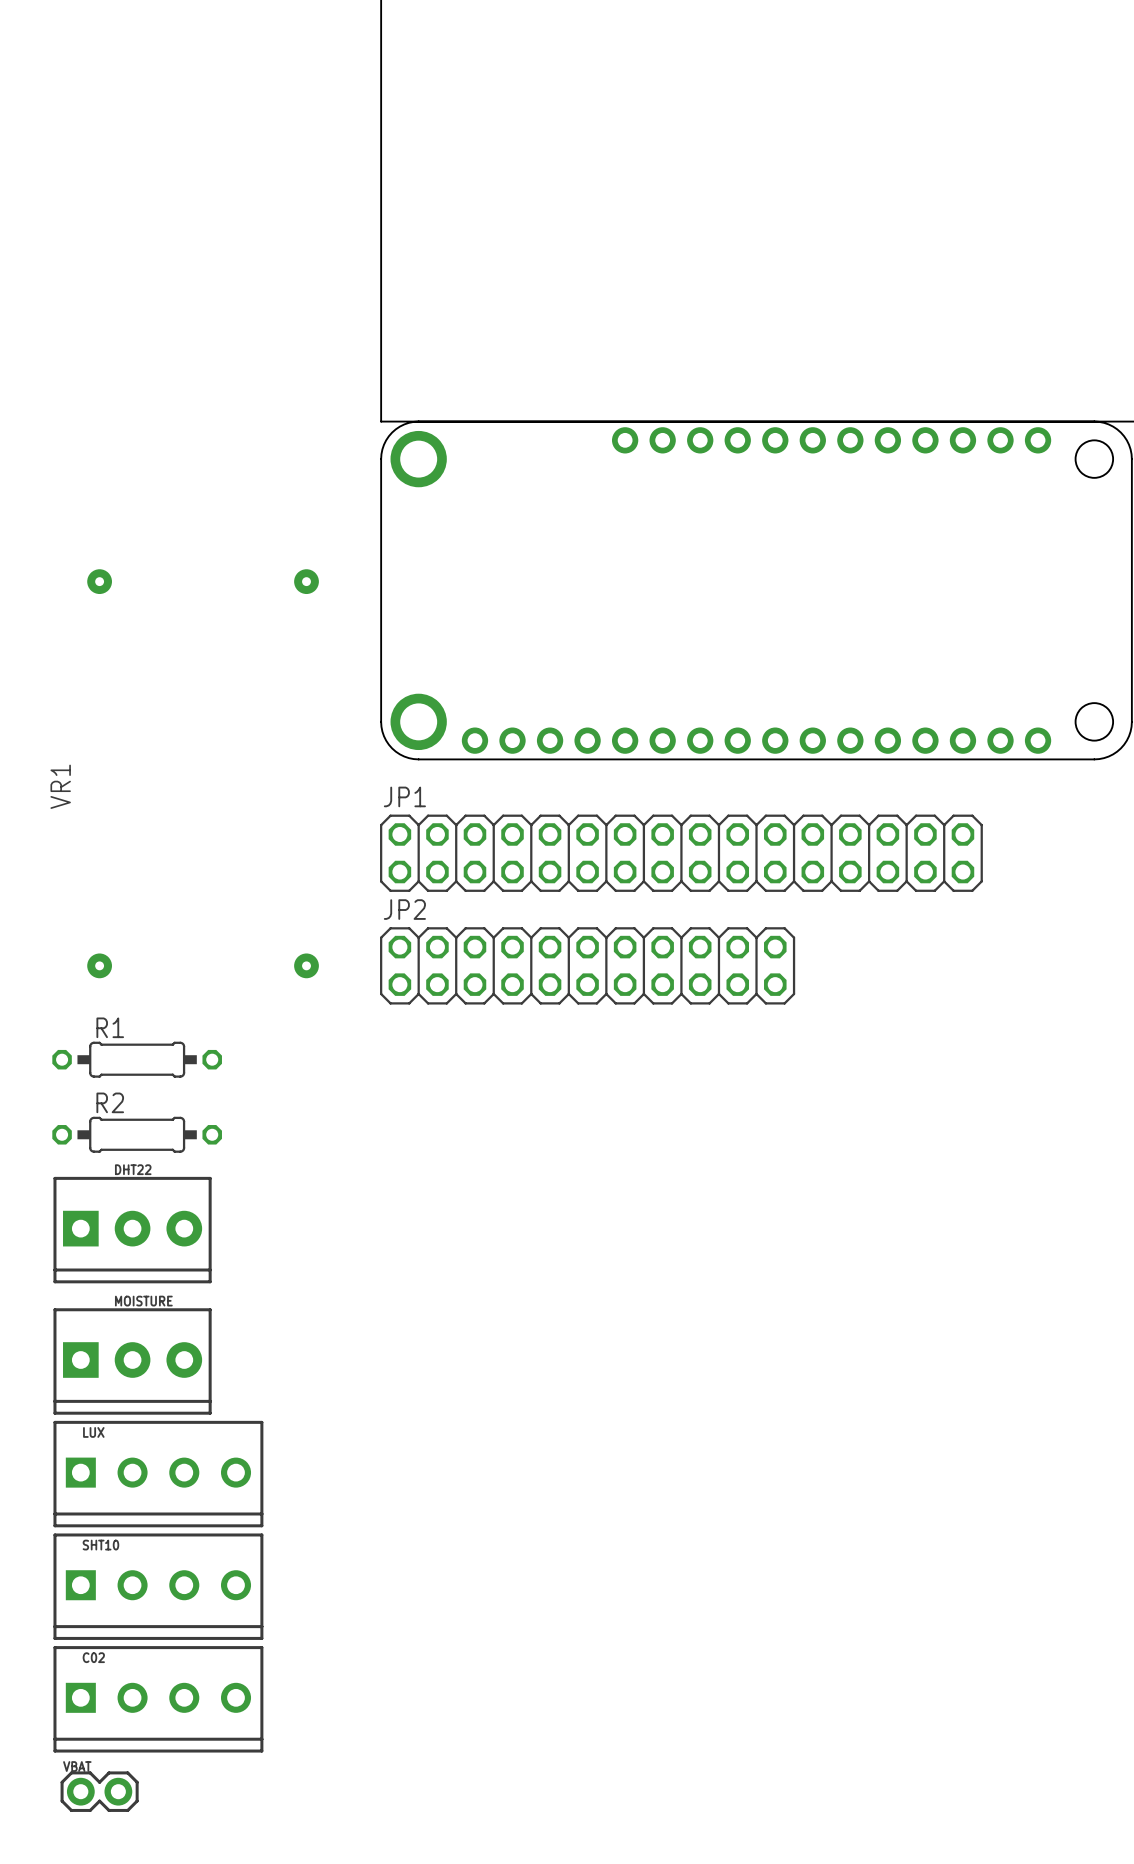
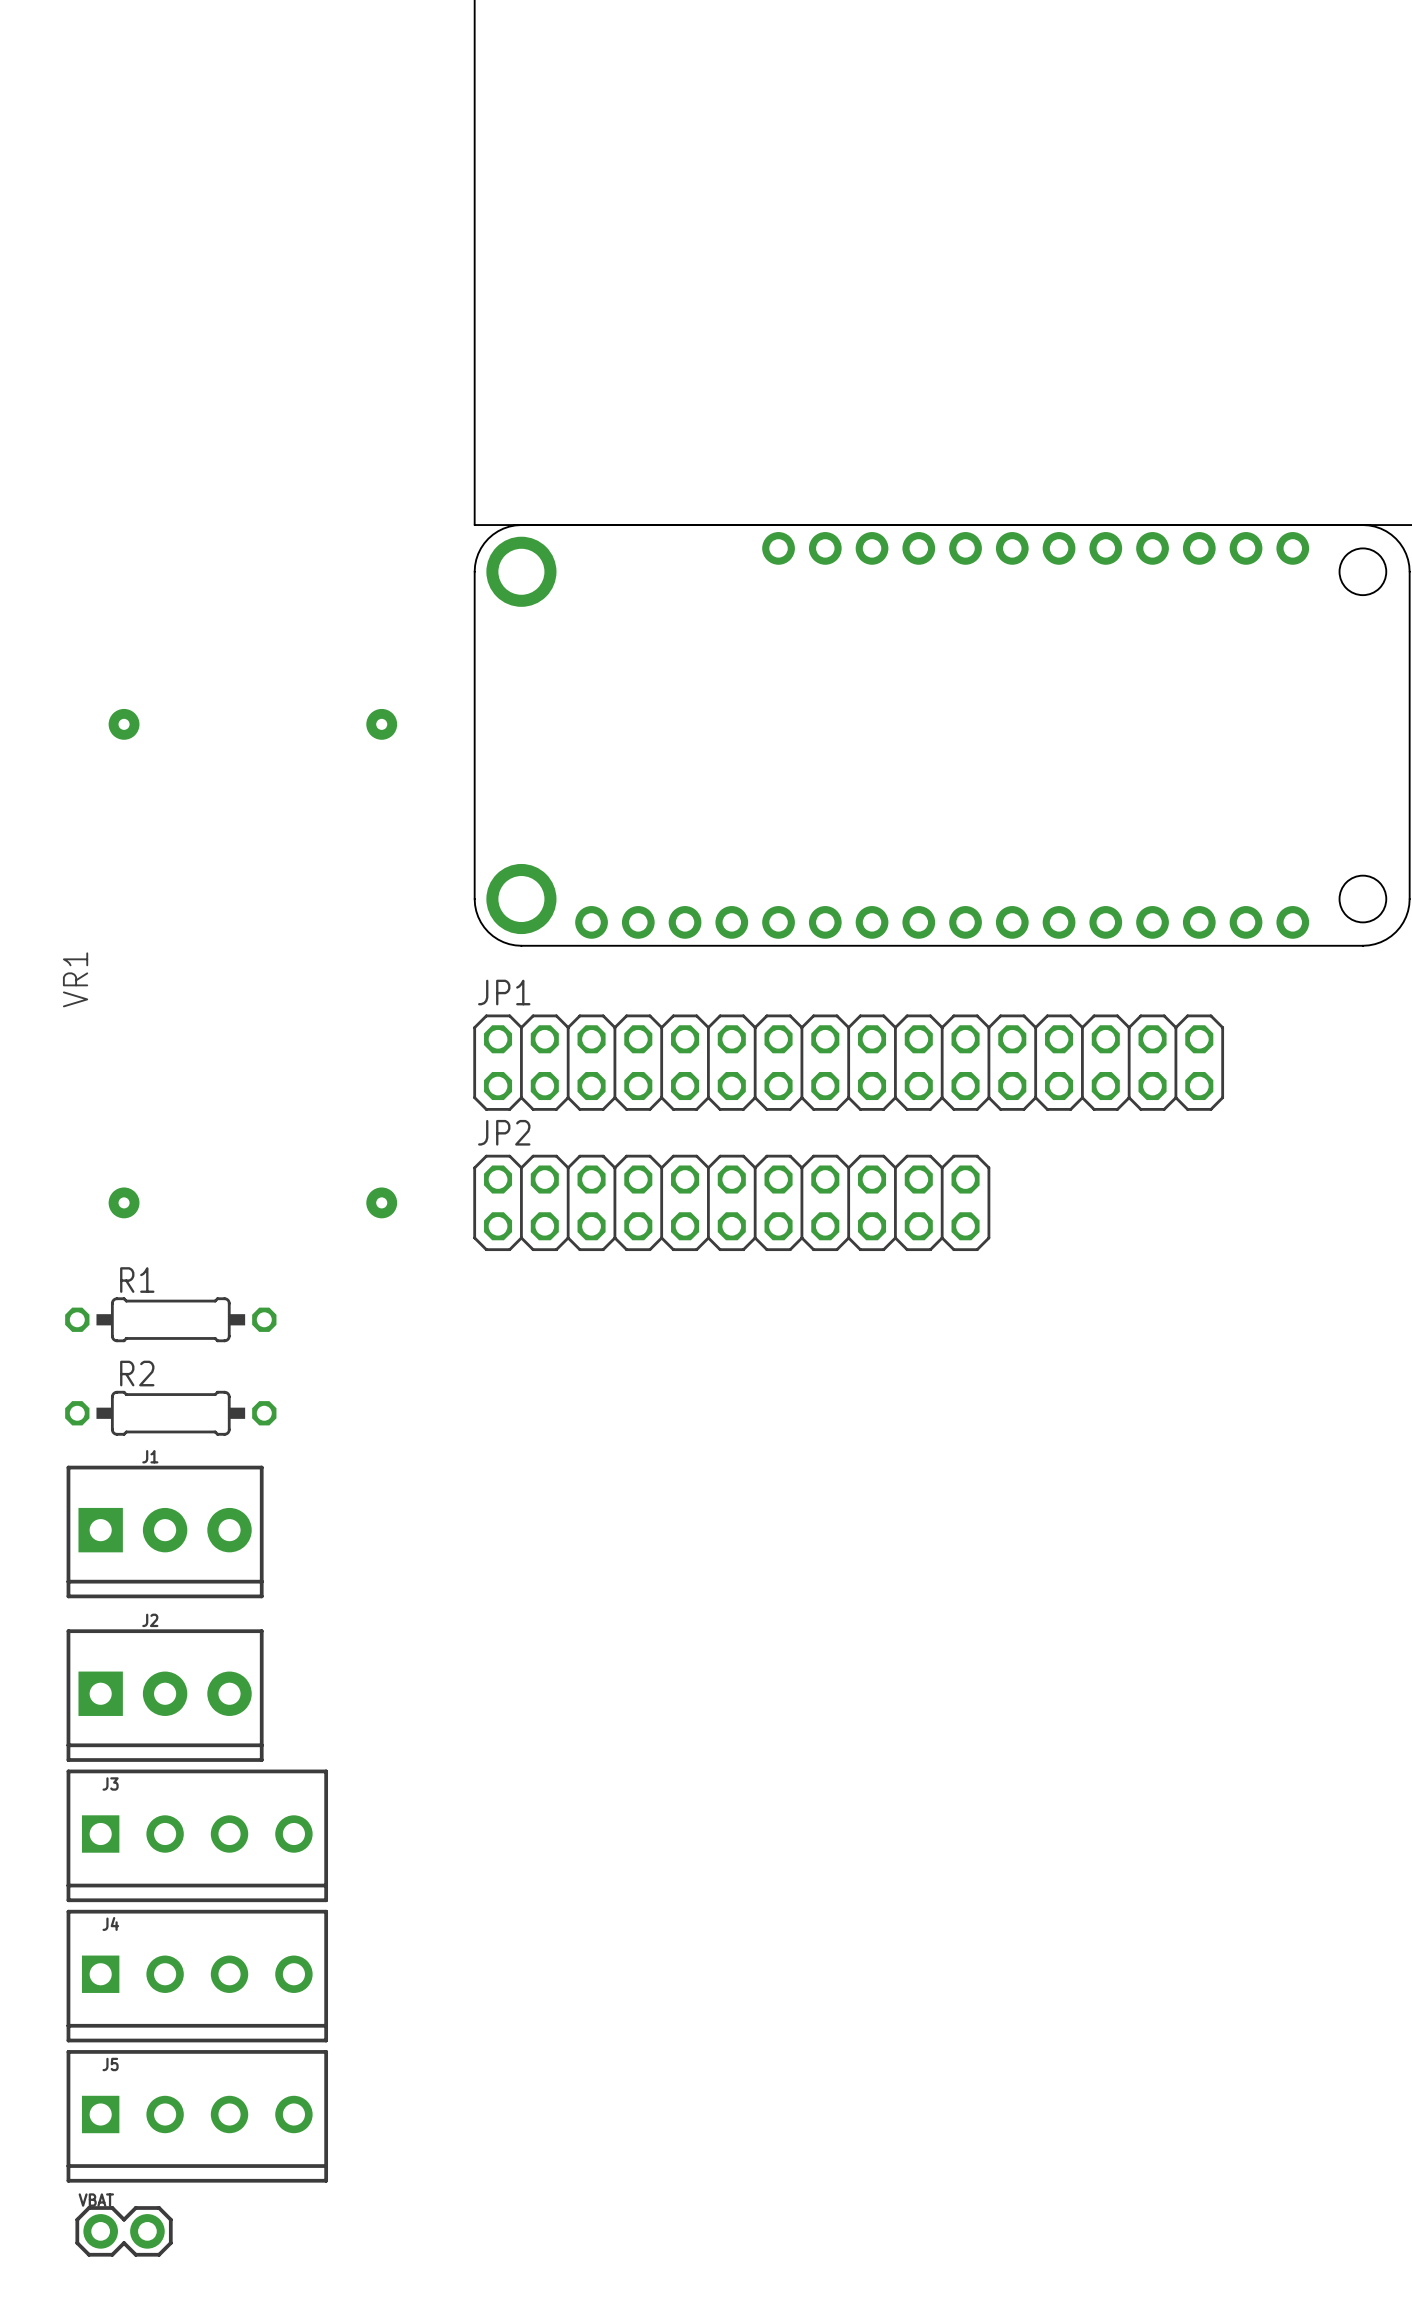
DHT22 name: DHT22 (133, 1169) -> J1 (150, 1456)
MOISTURE name: MOISTURE (143, 1301) -> J2 (150, 1620)
LUX name: LUX (93, 1432) -> J3 (110, 1783)
SHT10 name: SHT10 (100, 1545) -> J4 (110, 1923)
C02 name: C02 (93, 1657) -> J5 (110, 2064)

